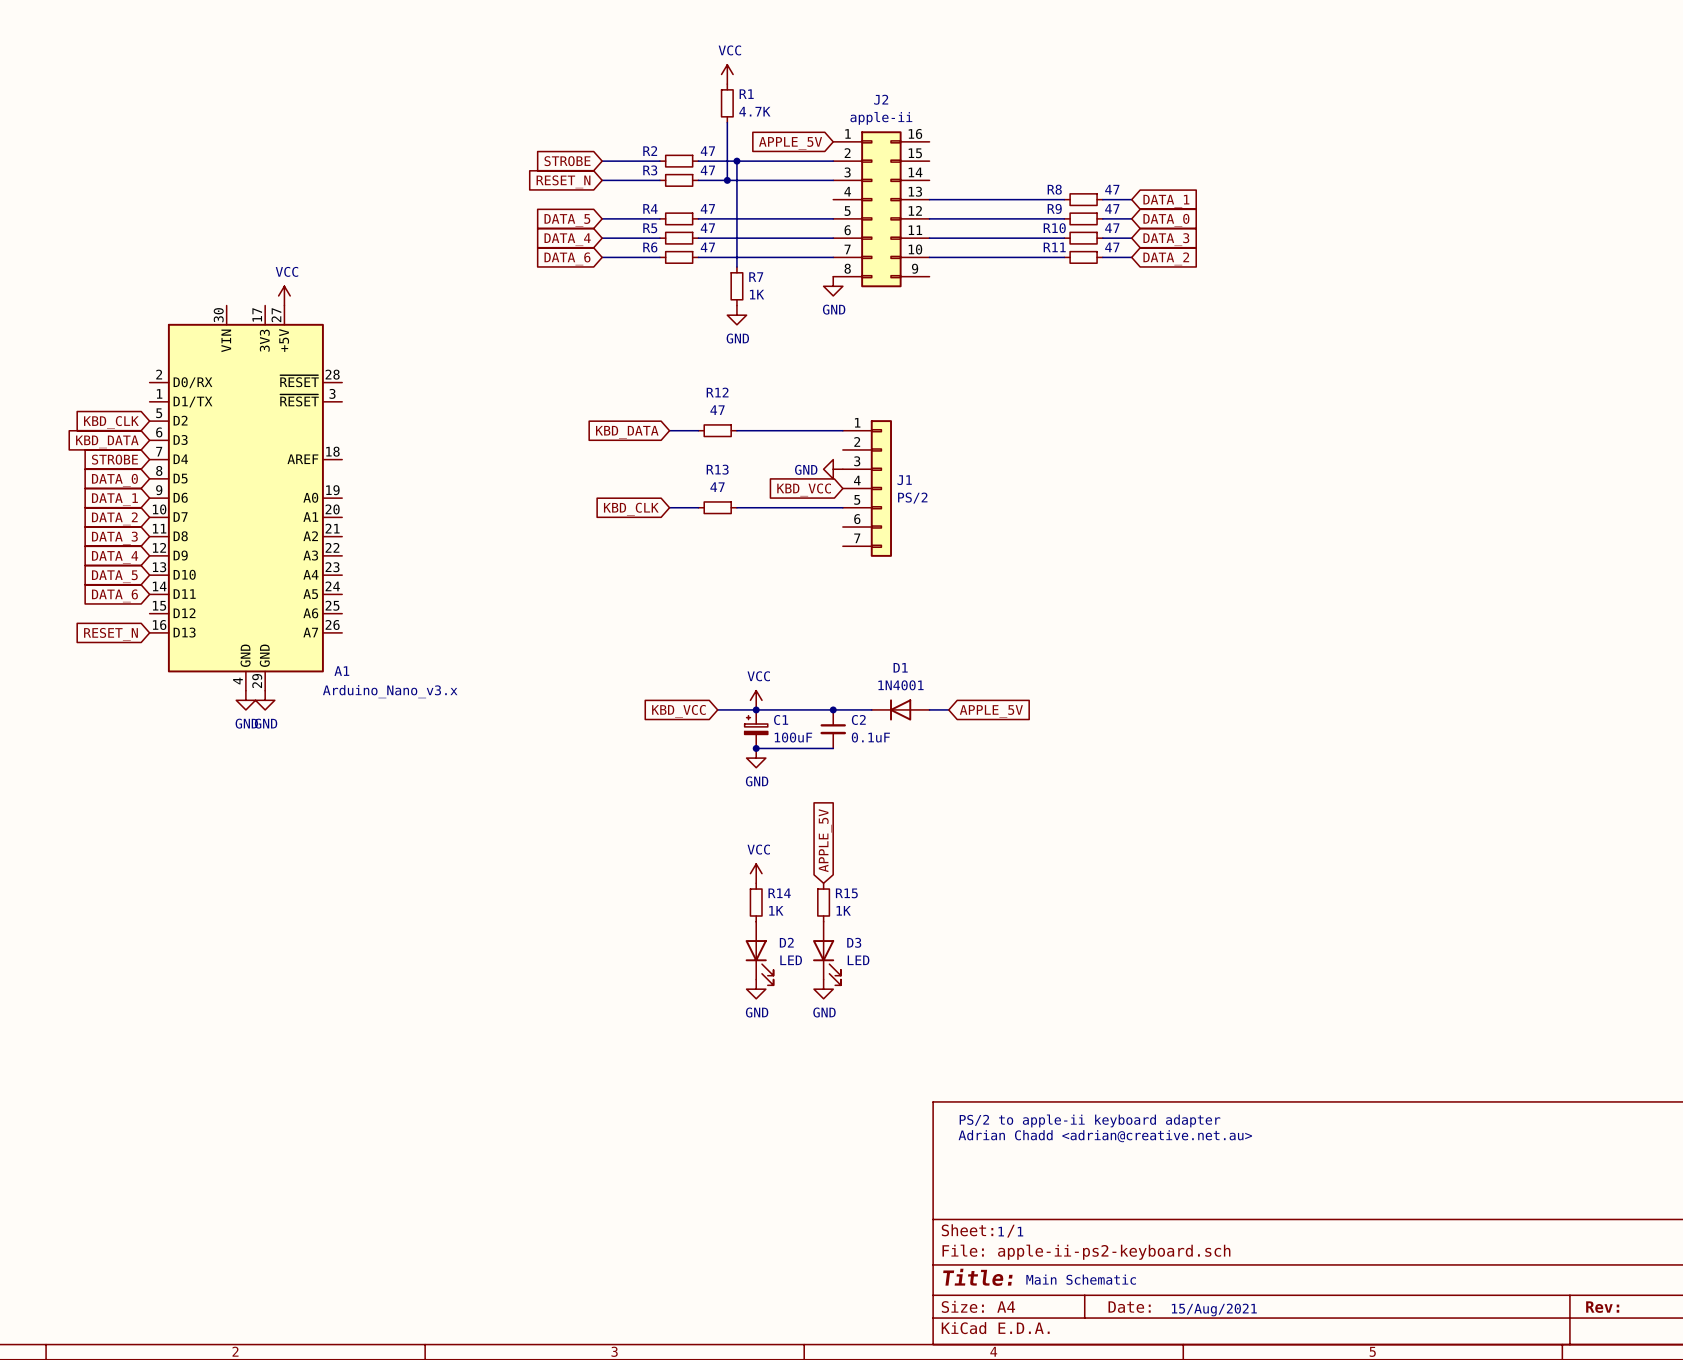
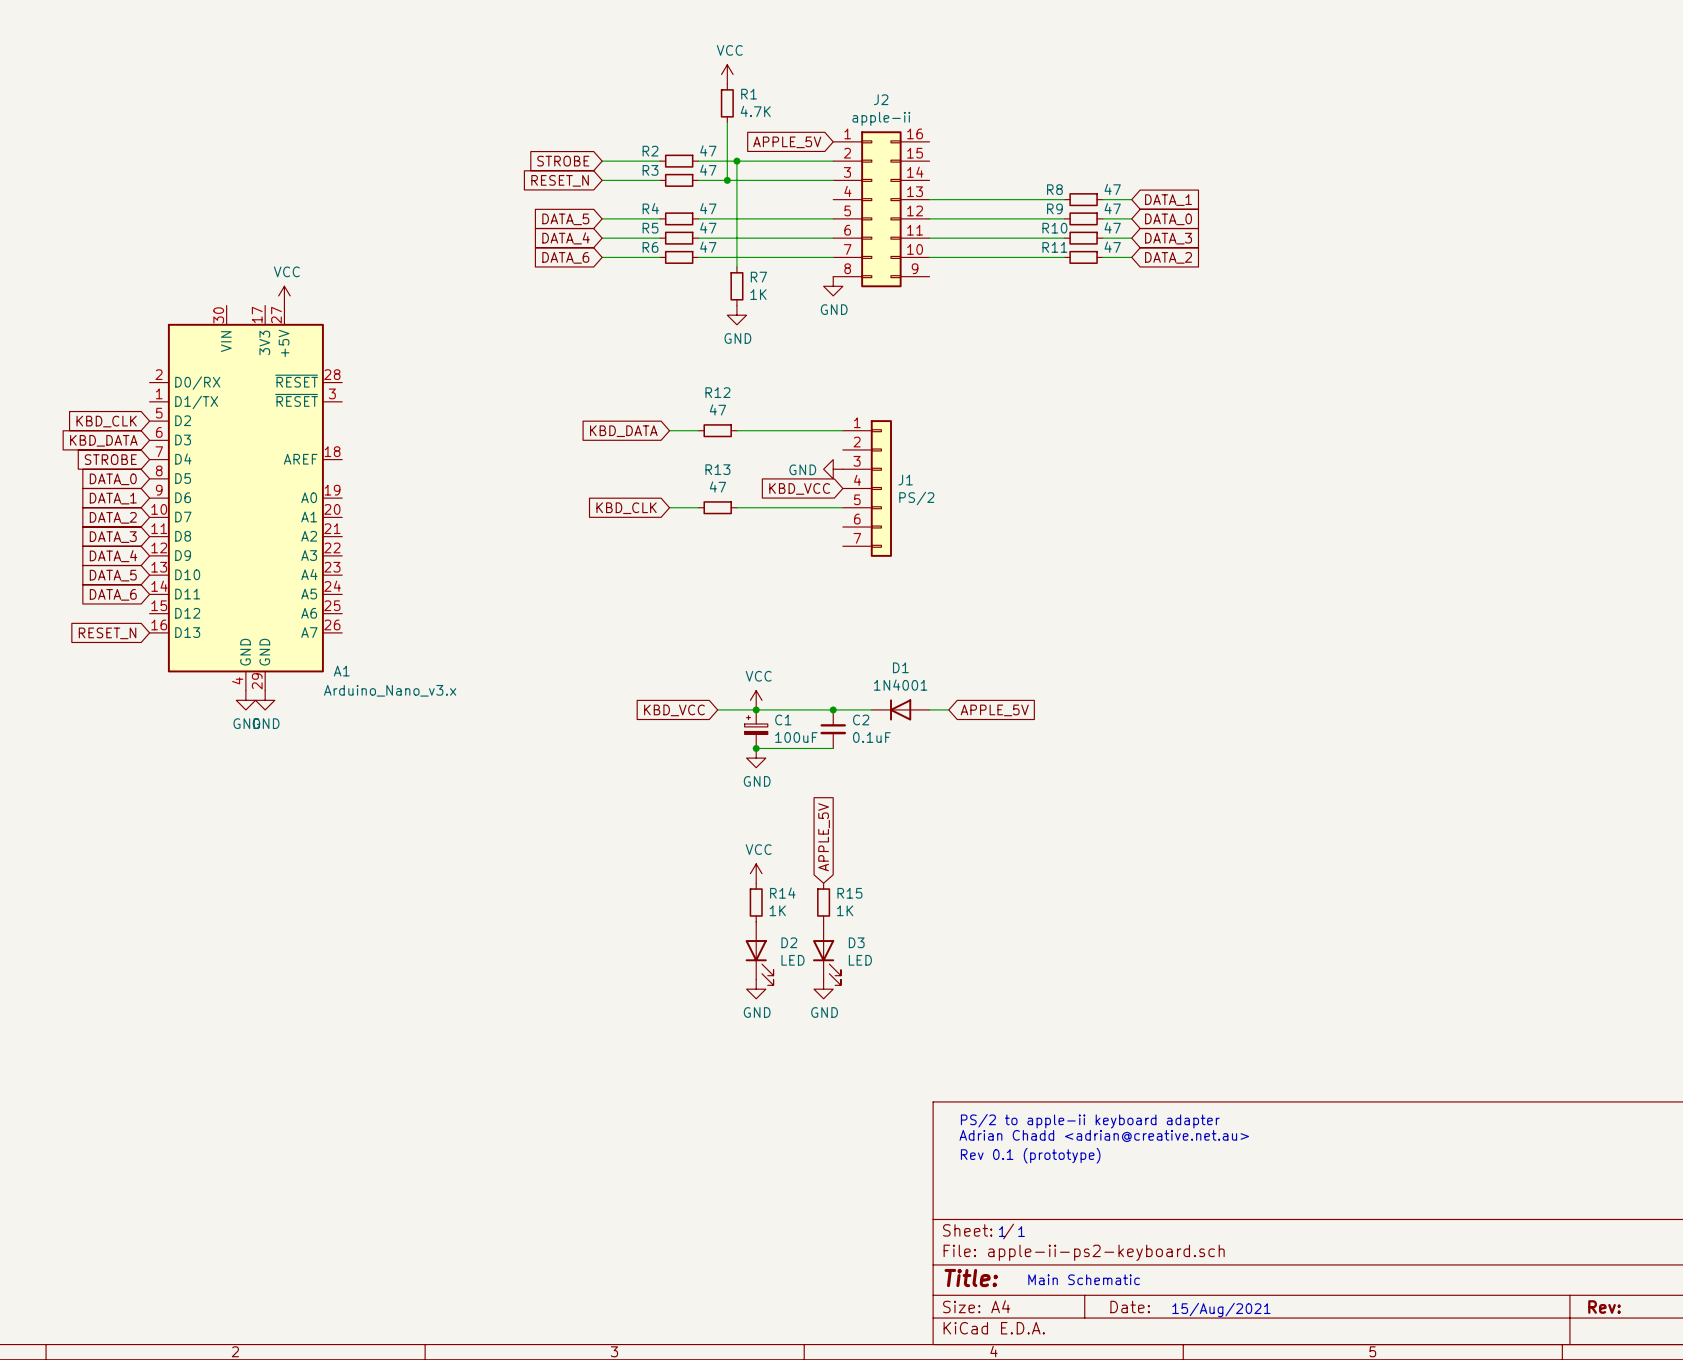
text: none -> Rev 0.1 (prototype) (1030, 1155)

